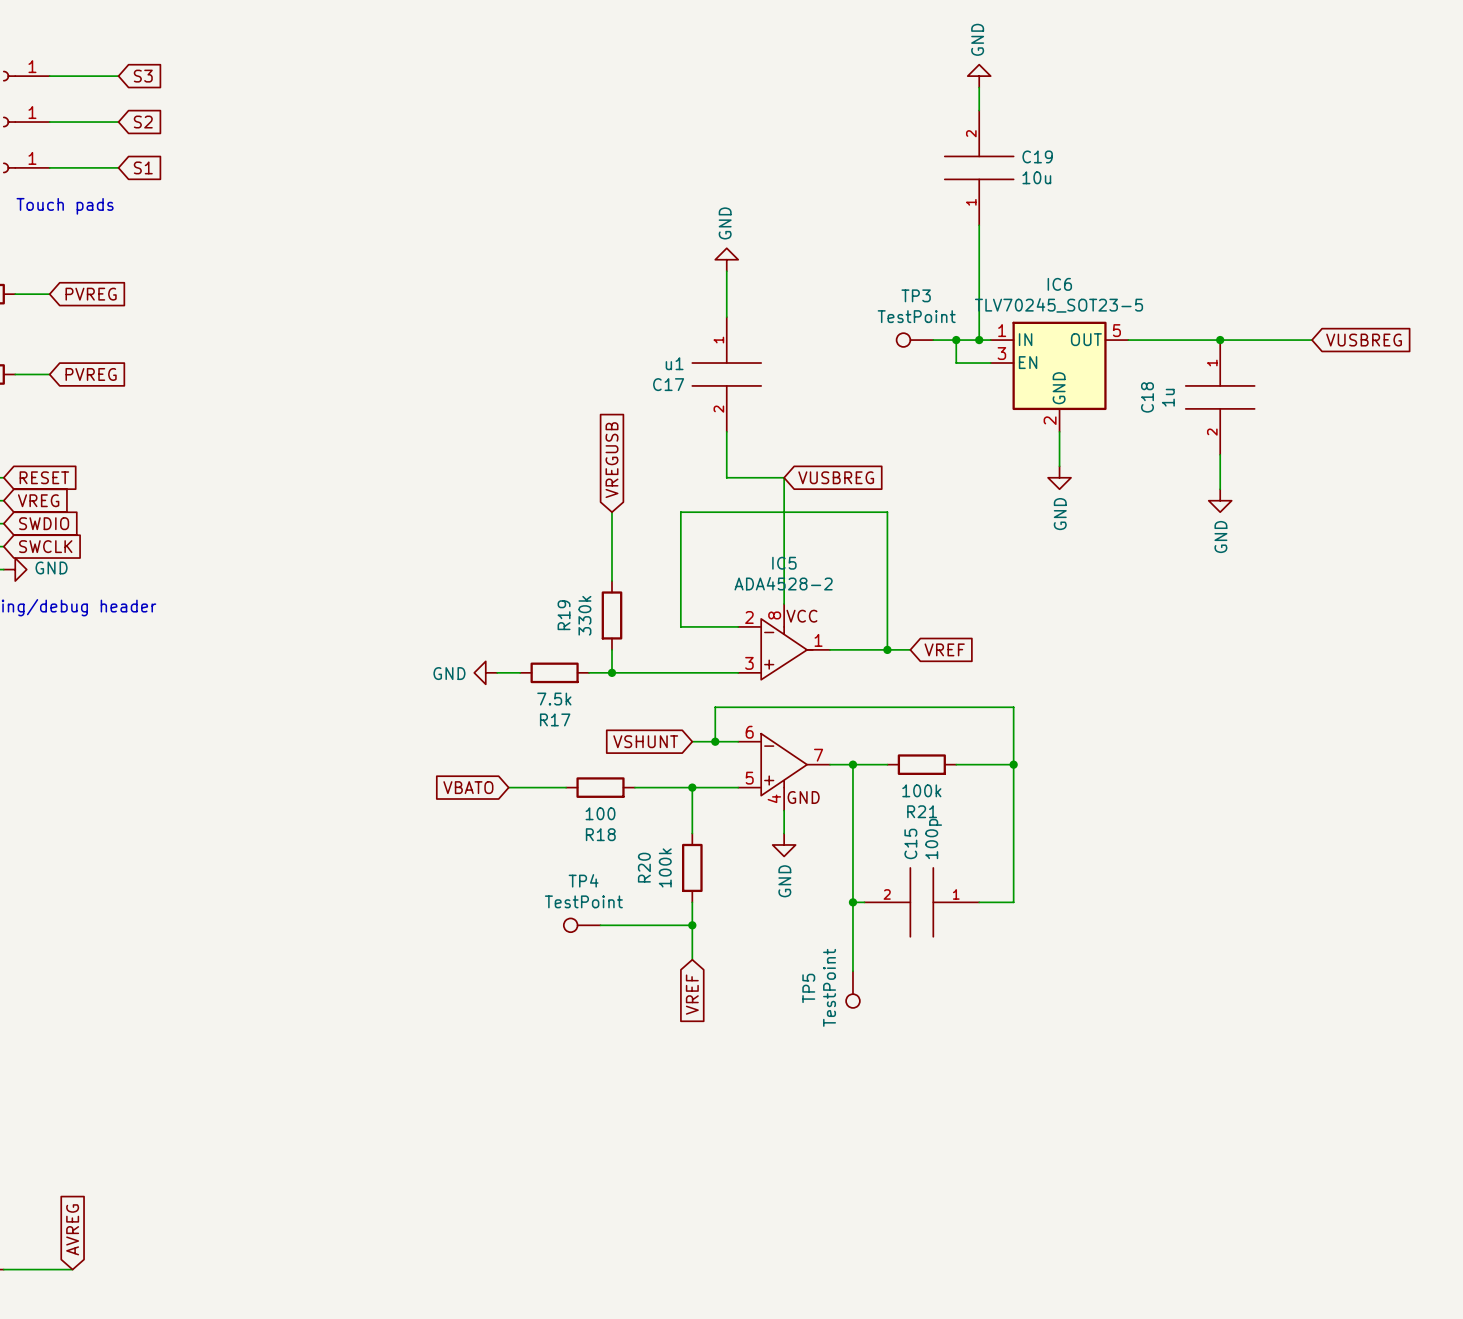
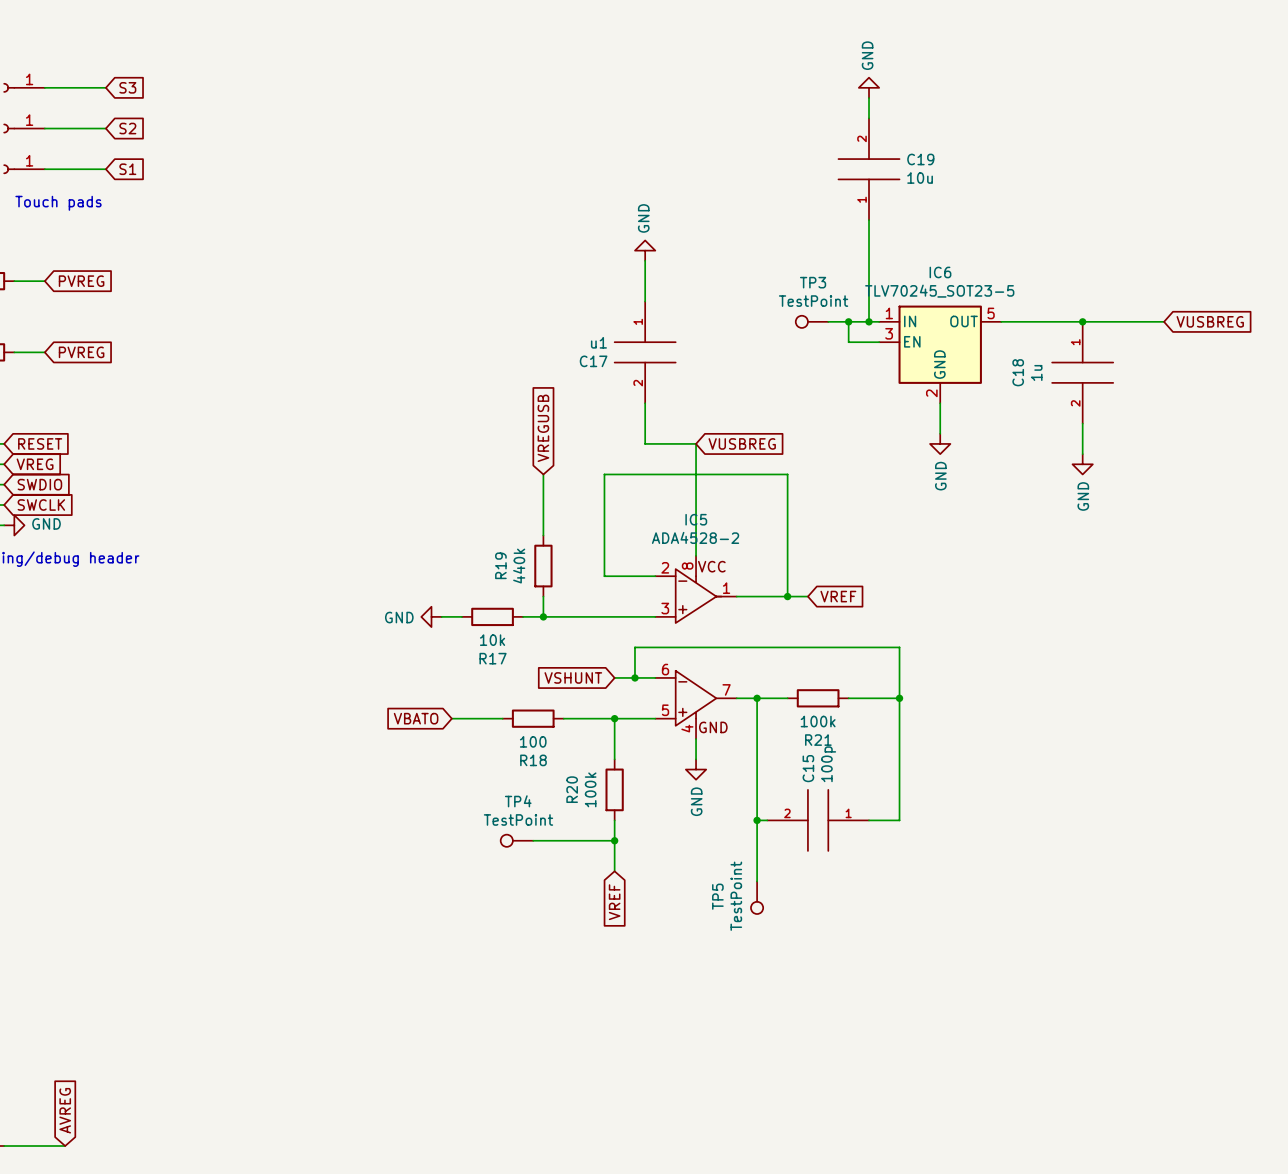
R19 value: 330k (584, 615) -> 440k (519, 566)
R17 value: 7.5k (554, 699) -> 10k (492, 640)

